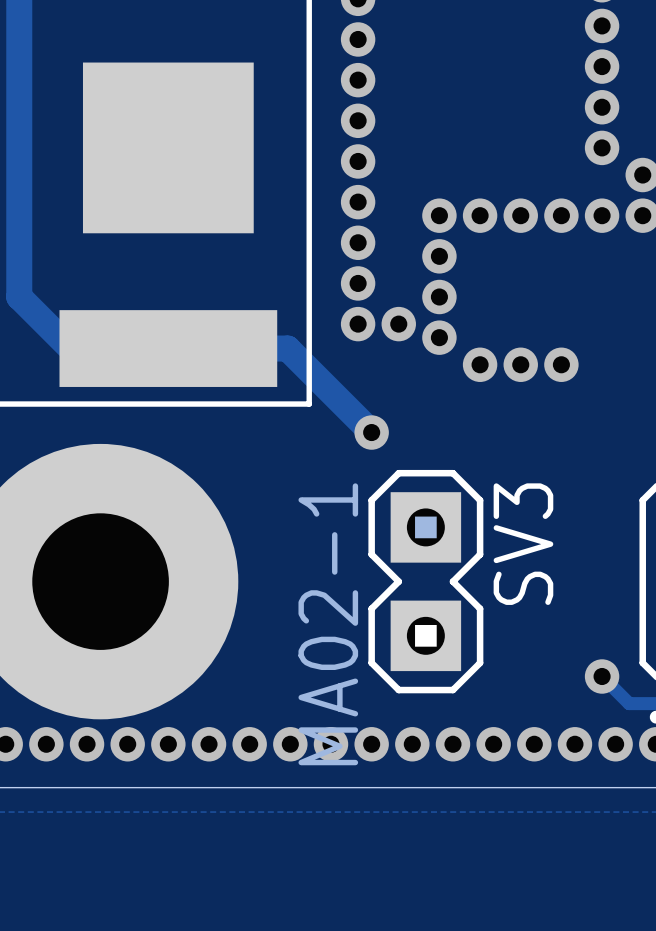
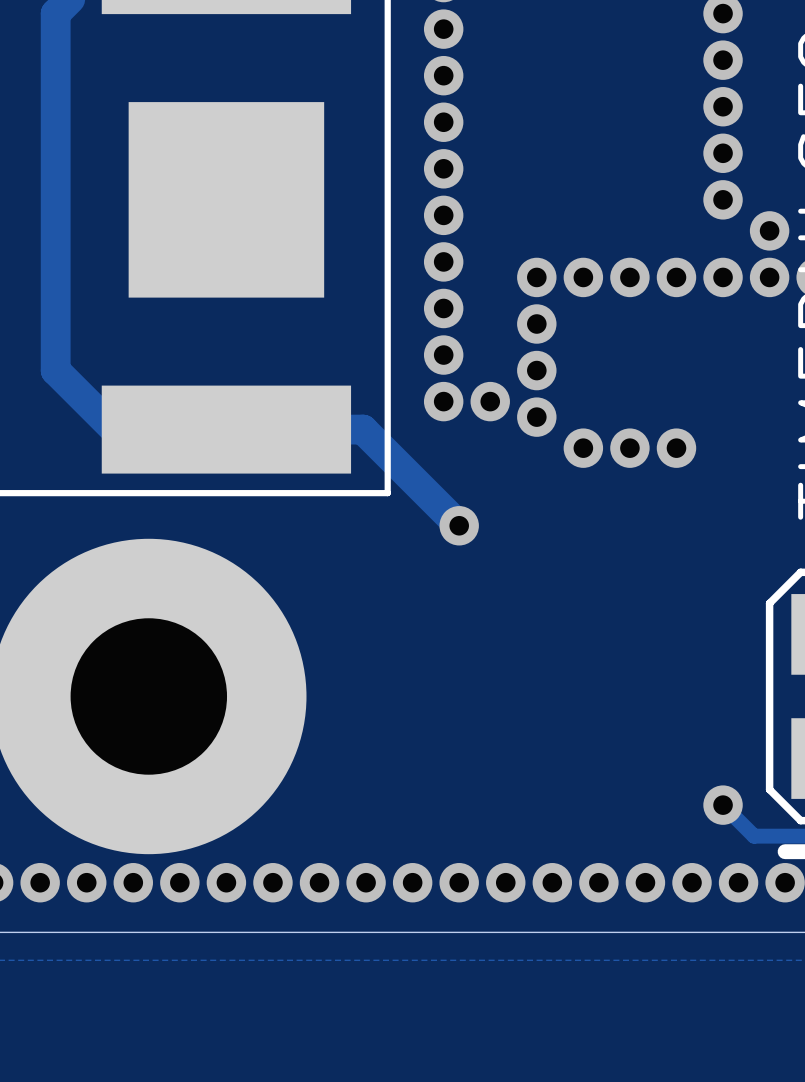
SV3: MA02-1 (425, 581) -> none

